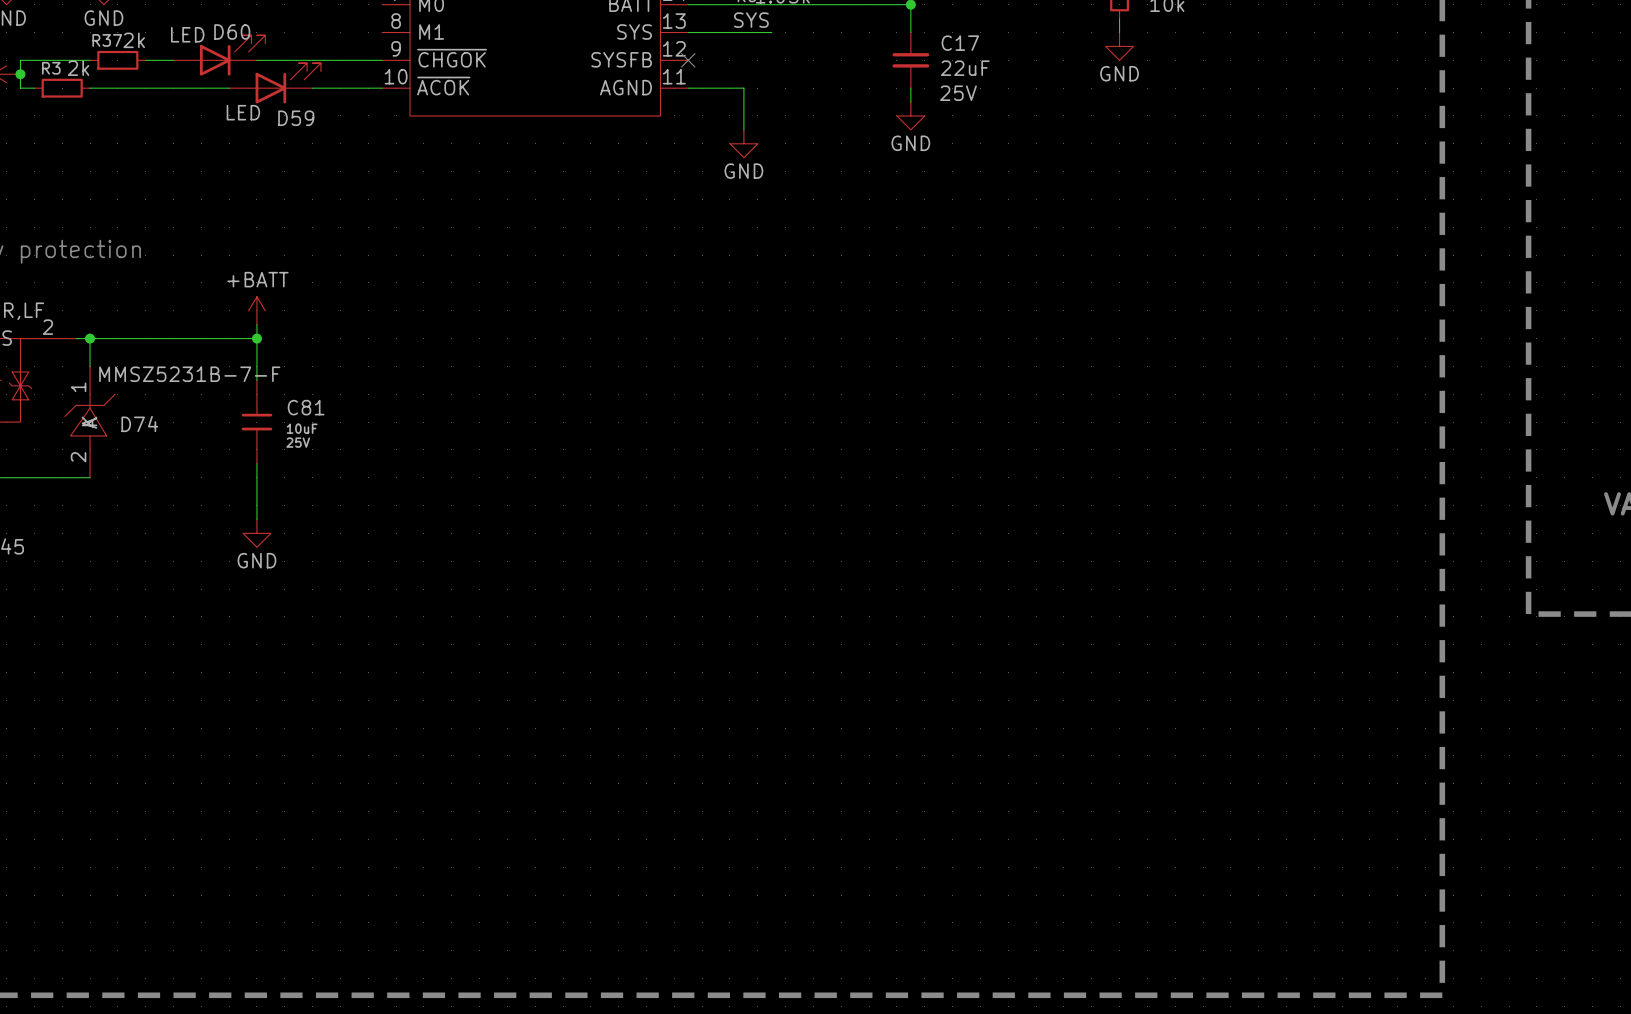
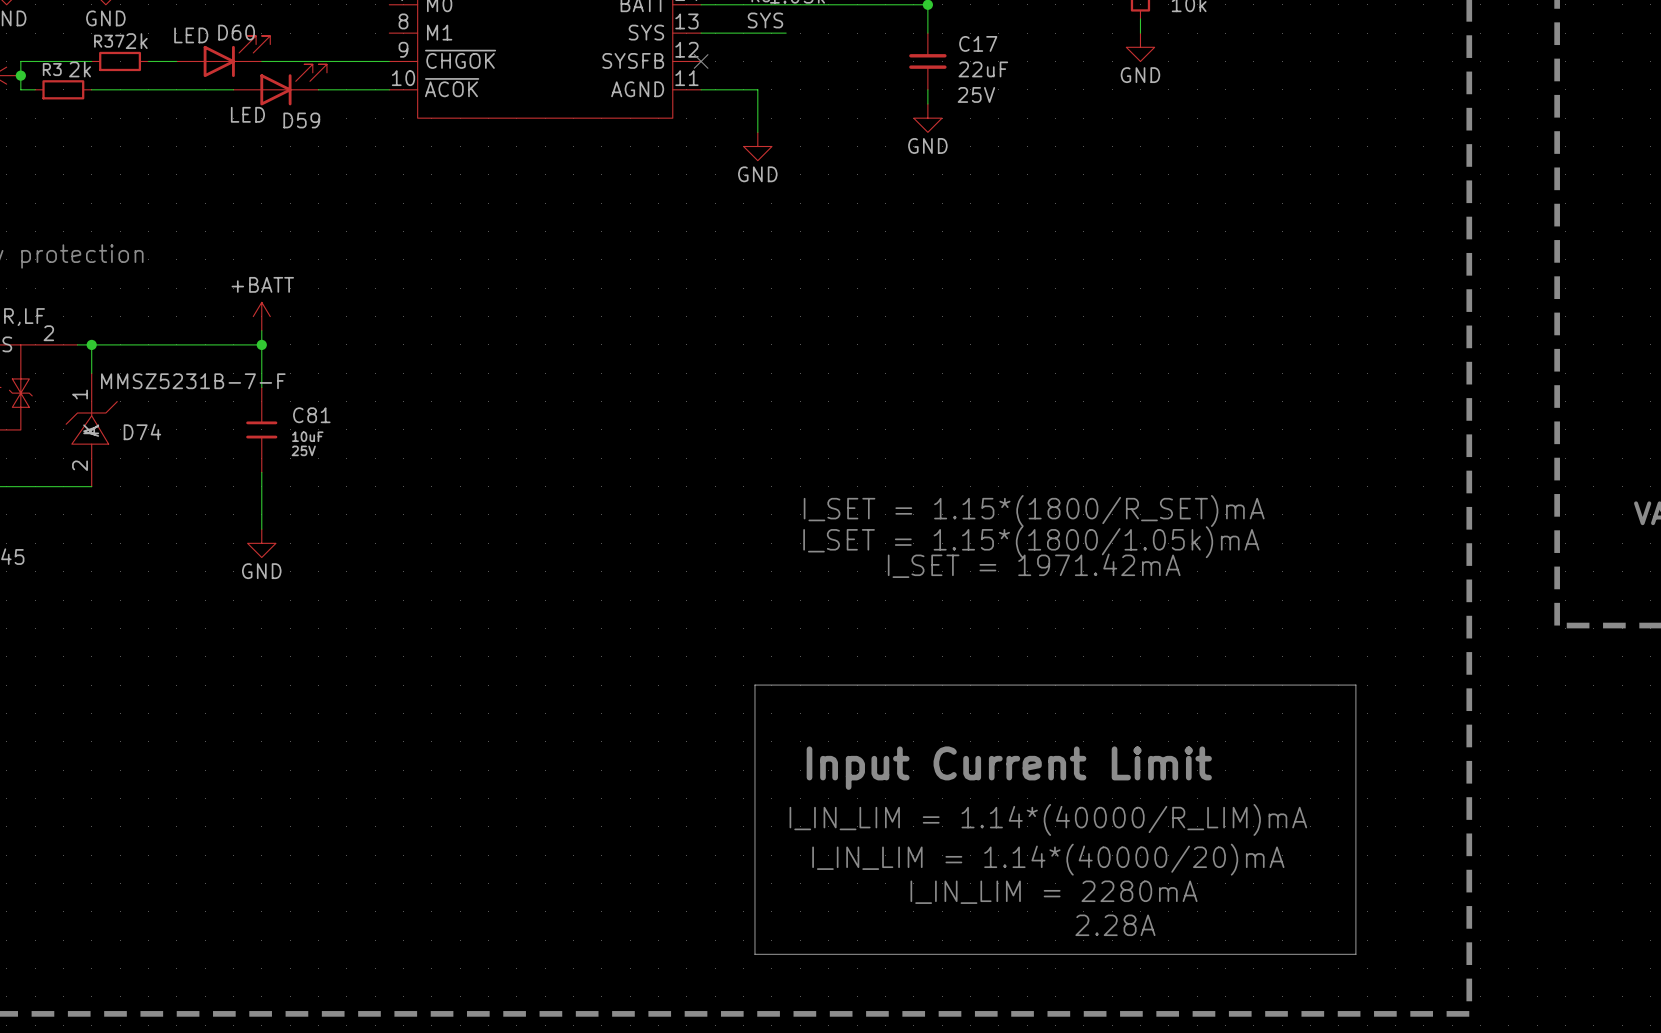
text: none -> I_SET = 1.15*(1800/R_SET)mA (1034, 510)
text: none -> I_SET = 1.15*(1800/1.05k)mA (1031, 542)
text: none -> I_SET = 1971.42mA (1034, 565)
line: none -> (754, 685) (1355, 685) (1355, 954) (754, 954) (754, 685)
text: none -> Input Current Limit (1009, 768)
text: none -> I_IN_LIM = 1.14*(40000/R_LIM)mA (1048, 819)
text: none -> I_IN_LIM = 1.14*(40000/20)mA (1048, 859)
text: none -> I_IN_LIM = 2280mA (1054, 892)
text: none -> 2.28A (1115, 925)

